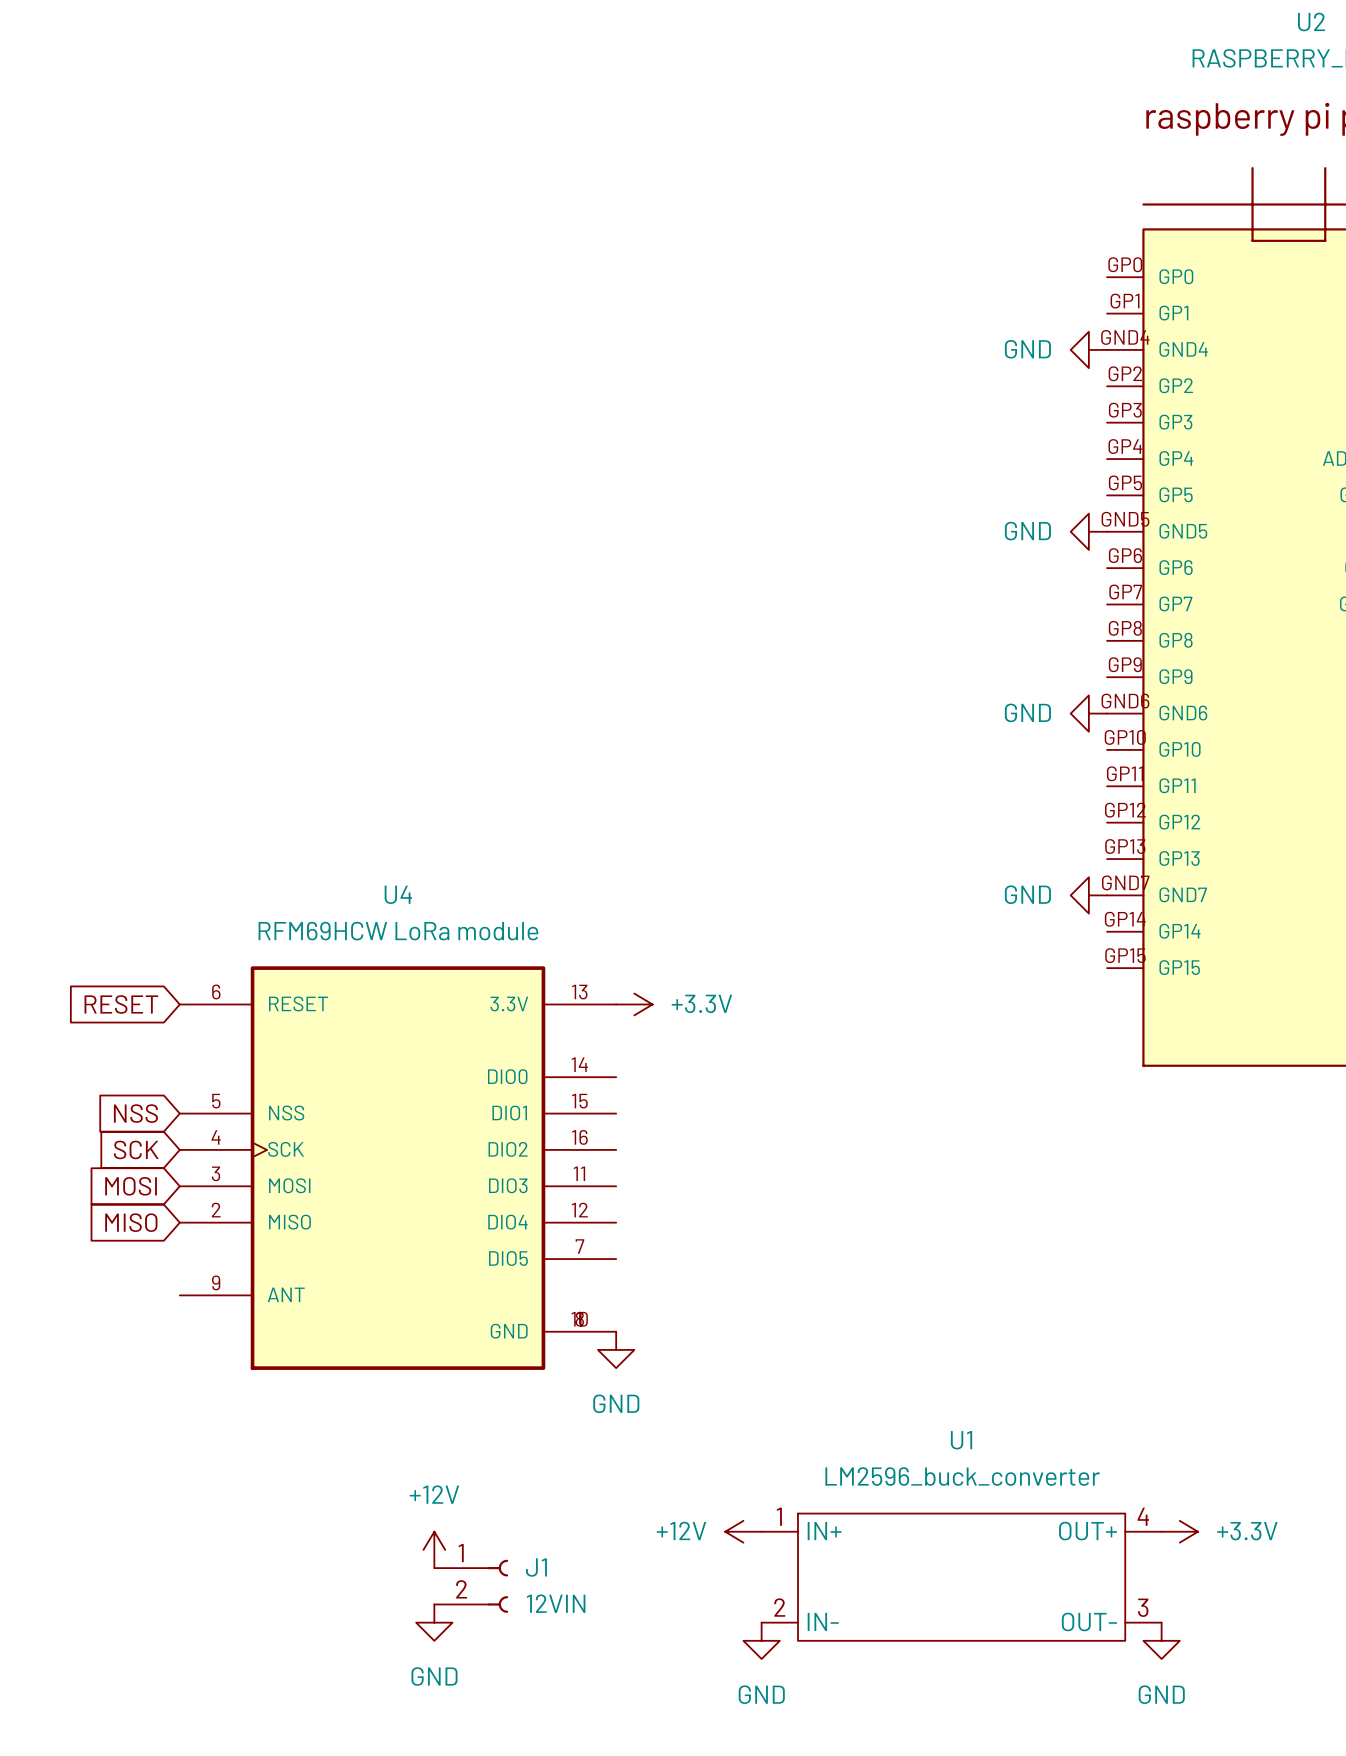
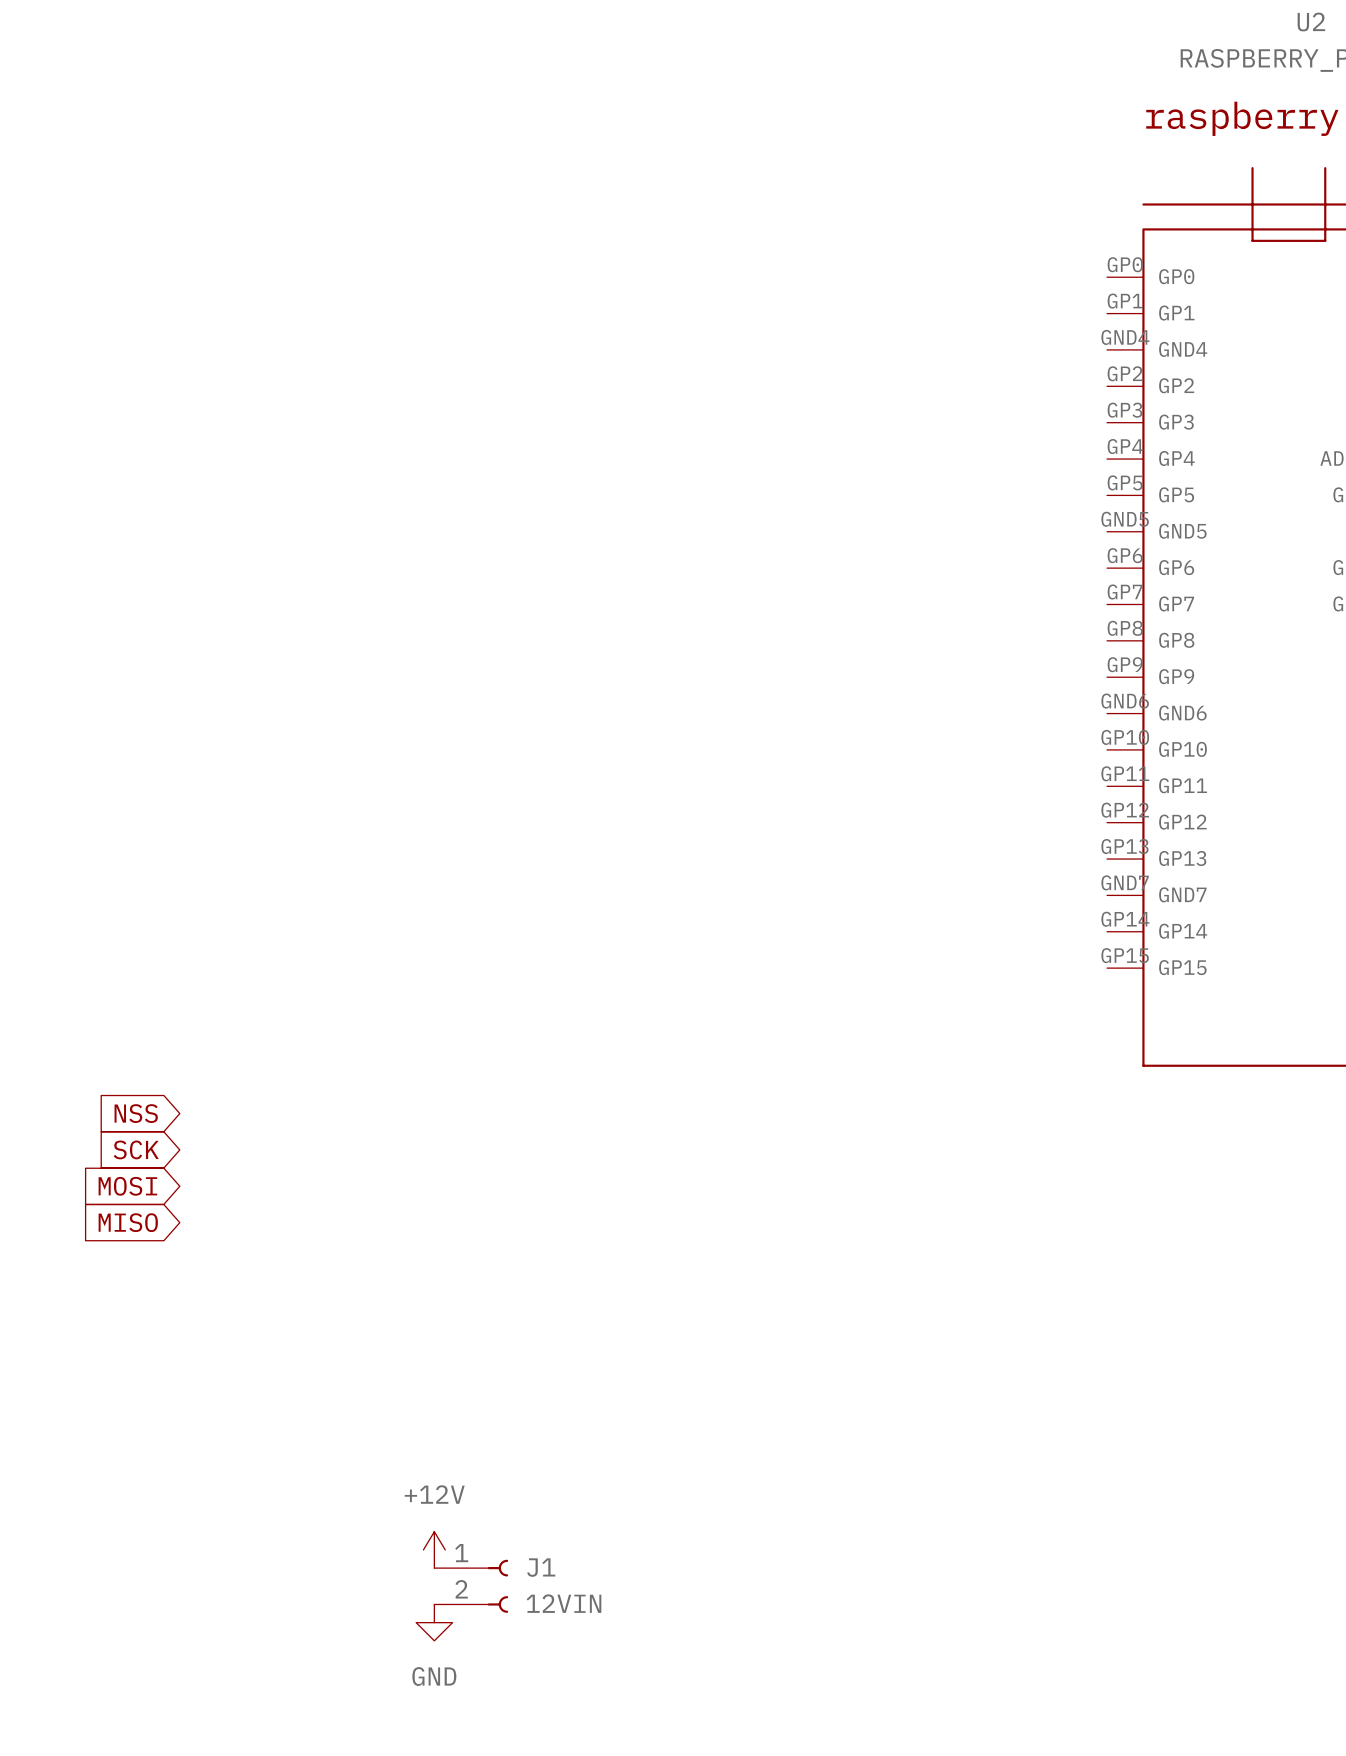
power symbol: GND (1088, 349) -> none
power symbol: GND (1088, 531) -> none
power symbol: GND (1088, 713) -> none
power symbol: GND (1088, 895) -> none
global label: RESET (121, 1004) -> none
power symbol: +3.3V (634, 1004) -> none
U4: RFM69HCW LoRa module (397, 1168) -> none
power symbol: GND (616, 1349) -> none
power symbol: +12V (743, 1531) -> none
power symbol: +3.3V (1179, 1531) -> none
U1: LM2596_buck_converter (961, 1577) -> none
power symbol: GND (761, 1640) -> none
power symbol: GND (1161, 1640) -> none

